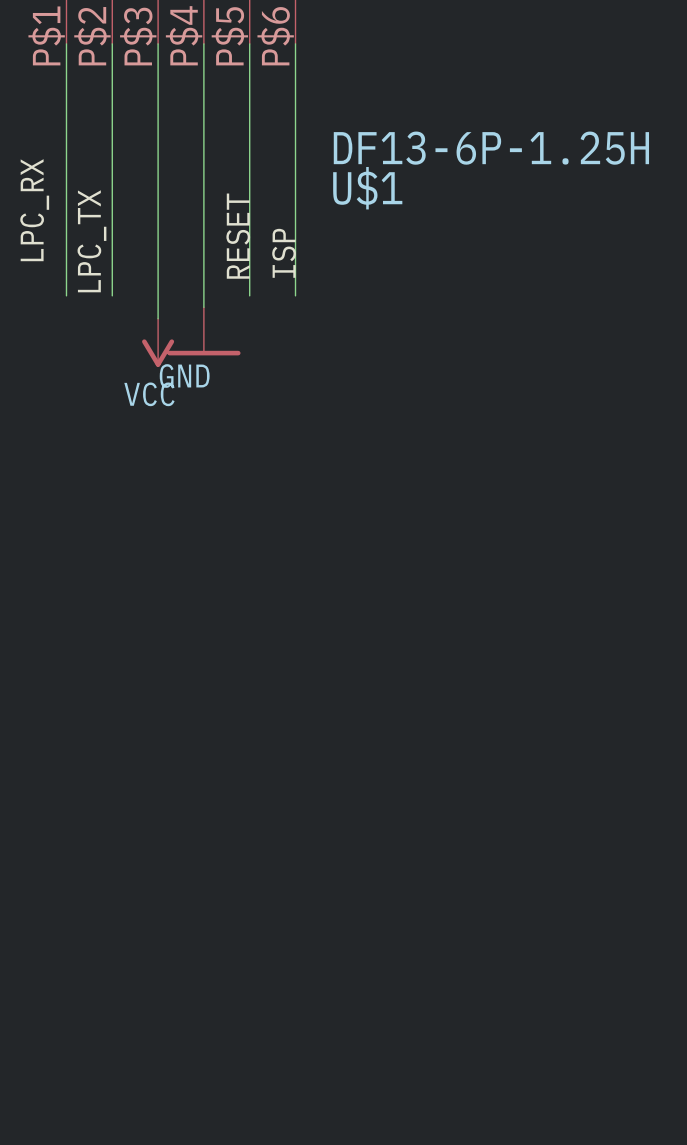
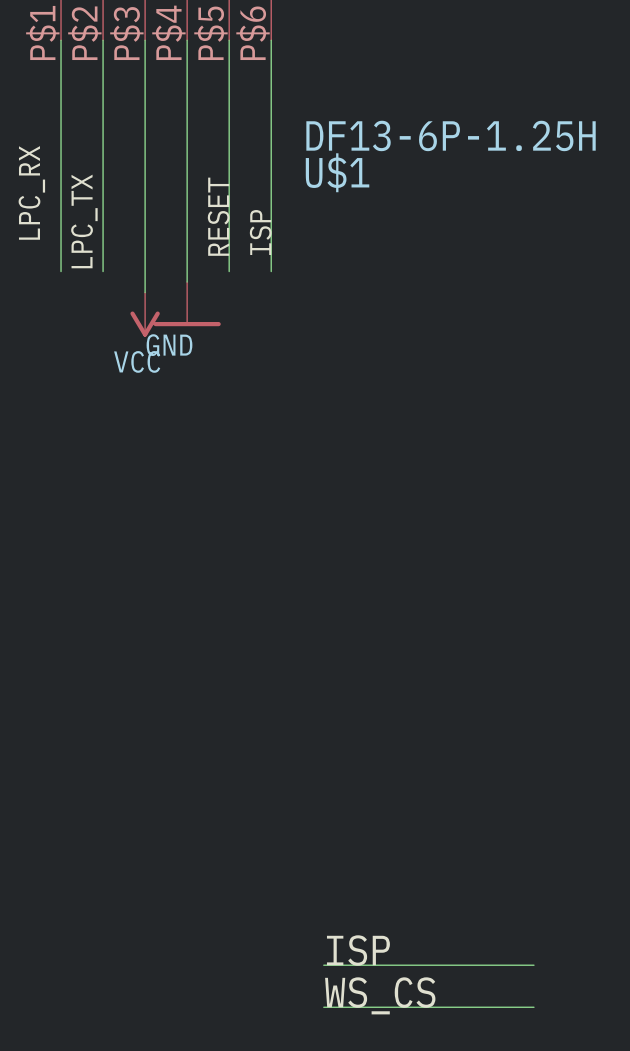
label: none -> ISP (358, 950)
wire: none -> (323, 965) (533, 965)
label: none -> WS_CS (380, 995)
wire: none -> (323, 1007) (533, 1007)

